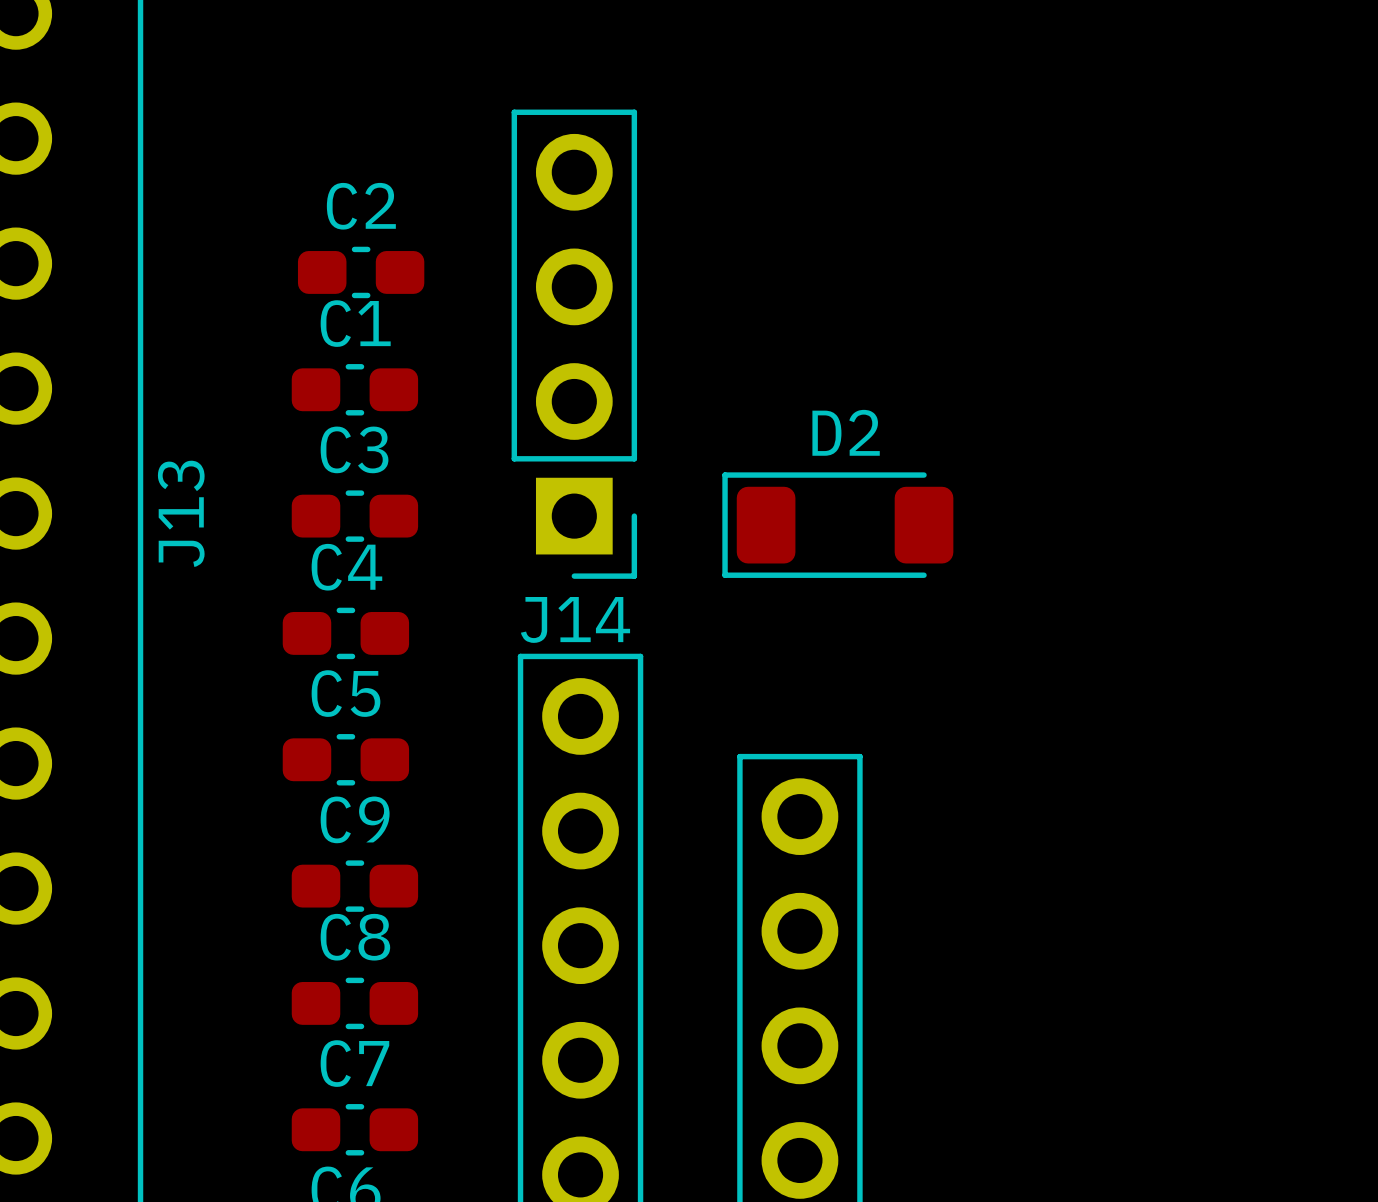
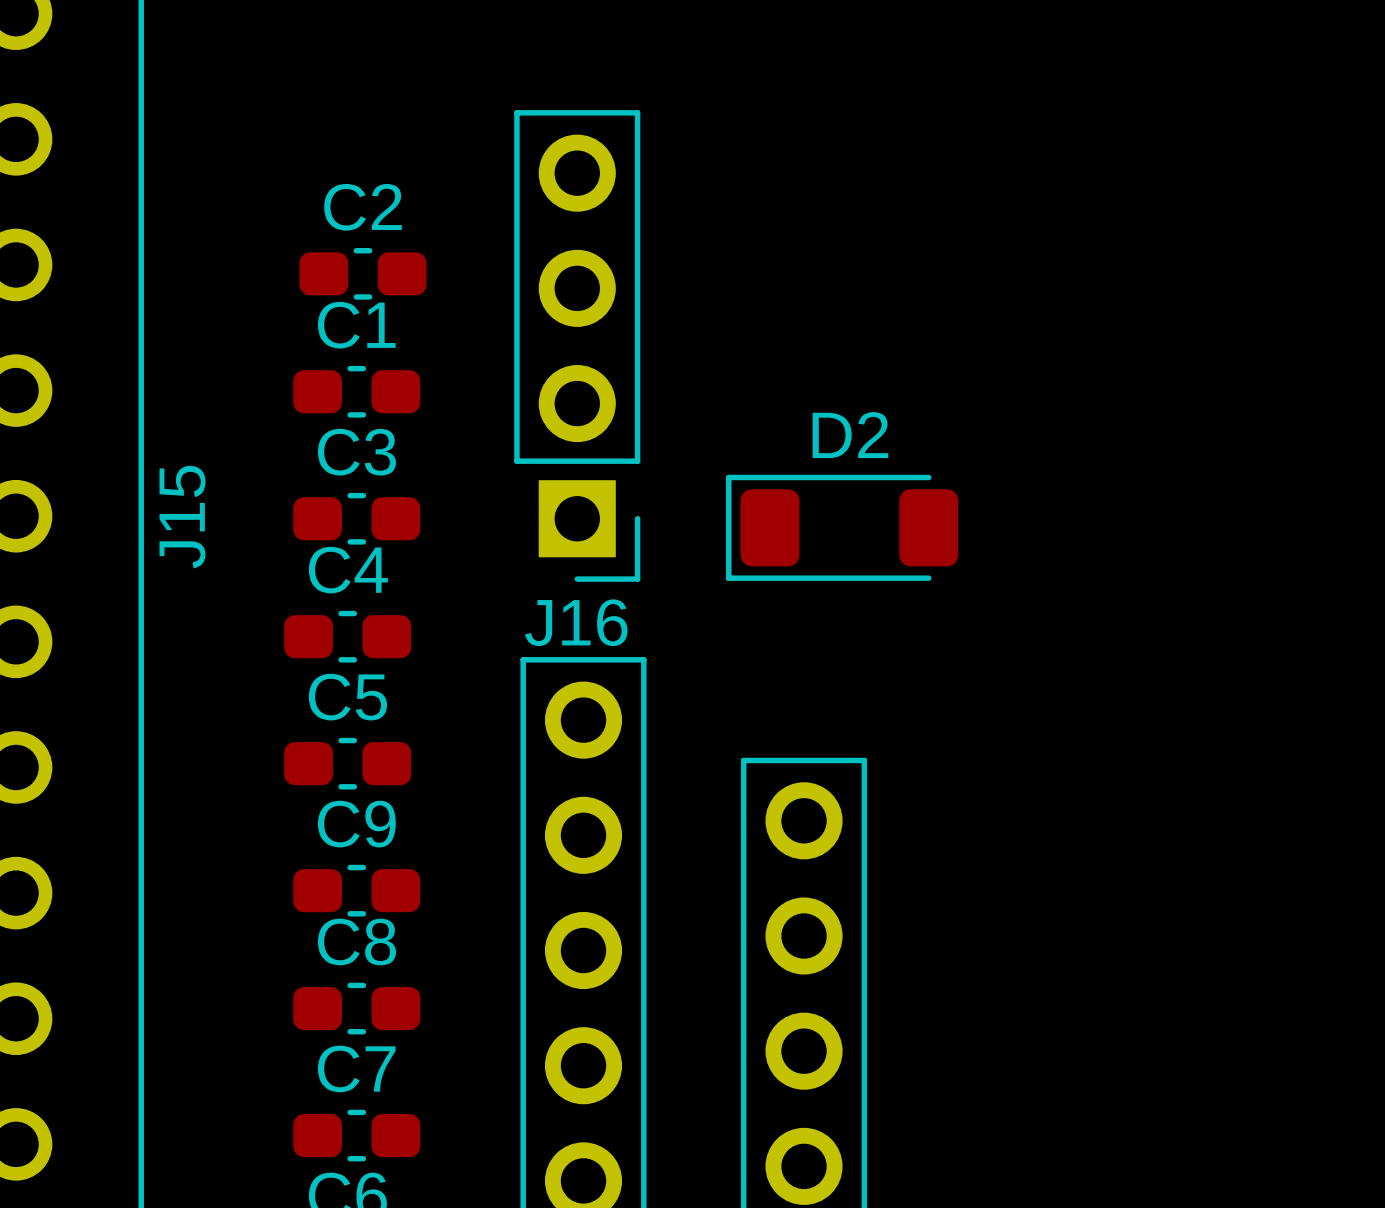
J13 name: J13 (181, 513) -> J15 (182, 517)
J14 name: J14 (575, 619) -> J16 (576, 622)

